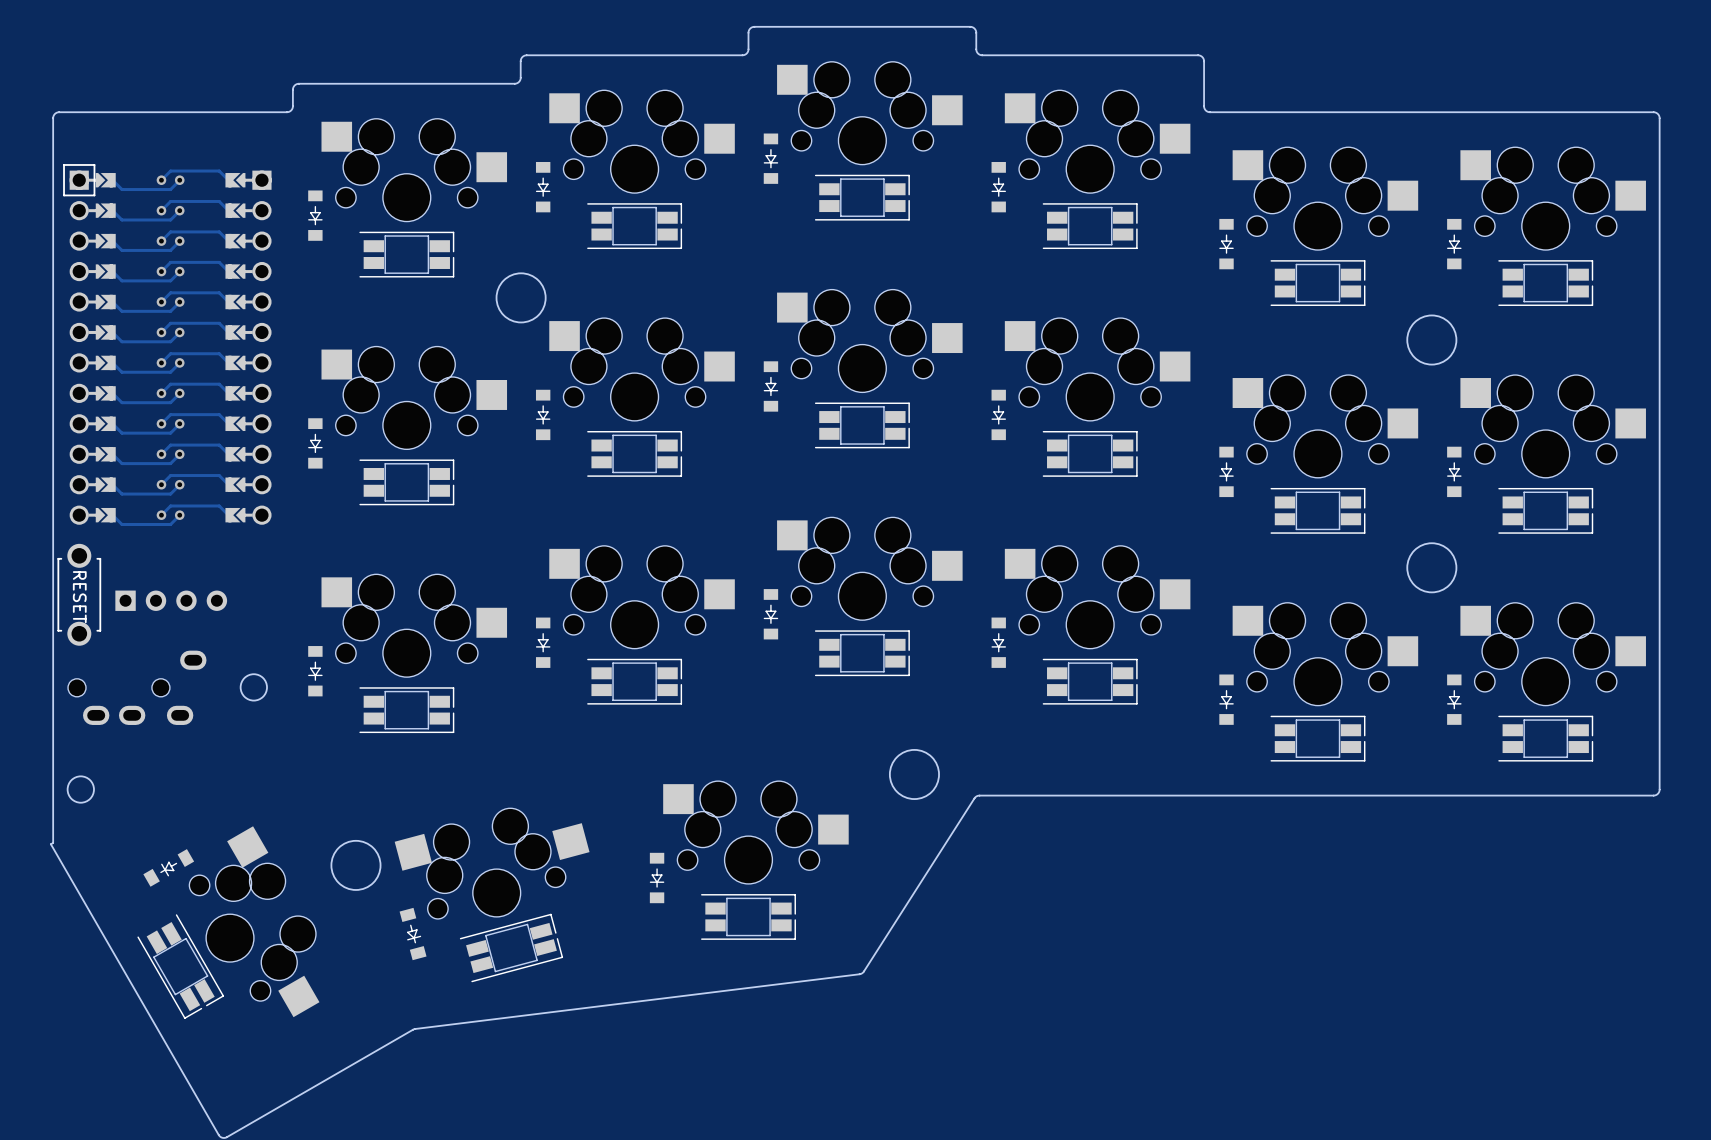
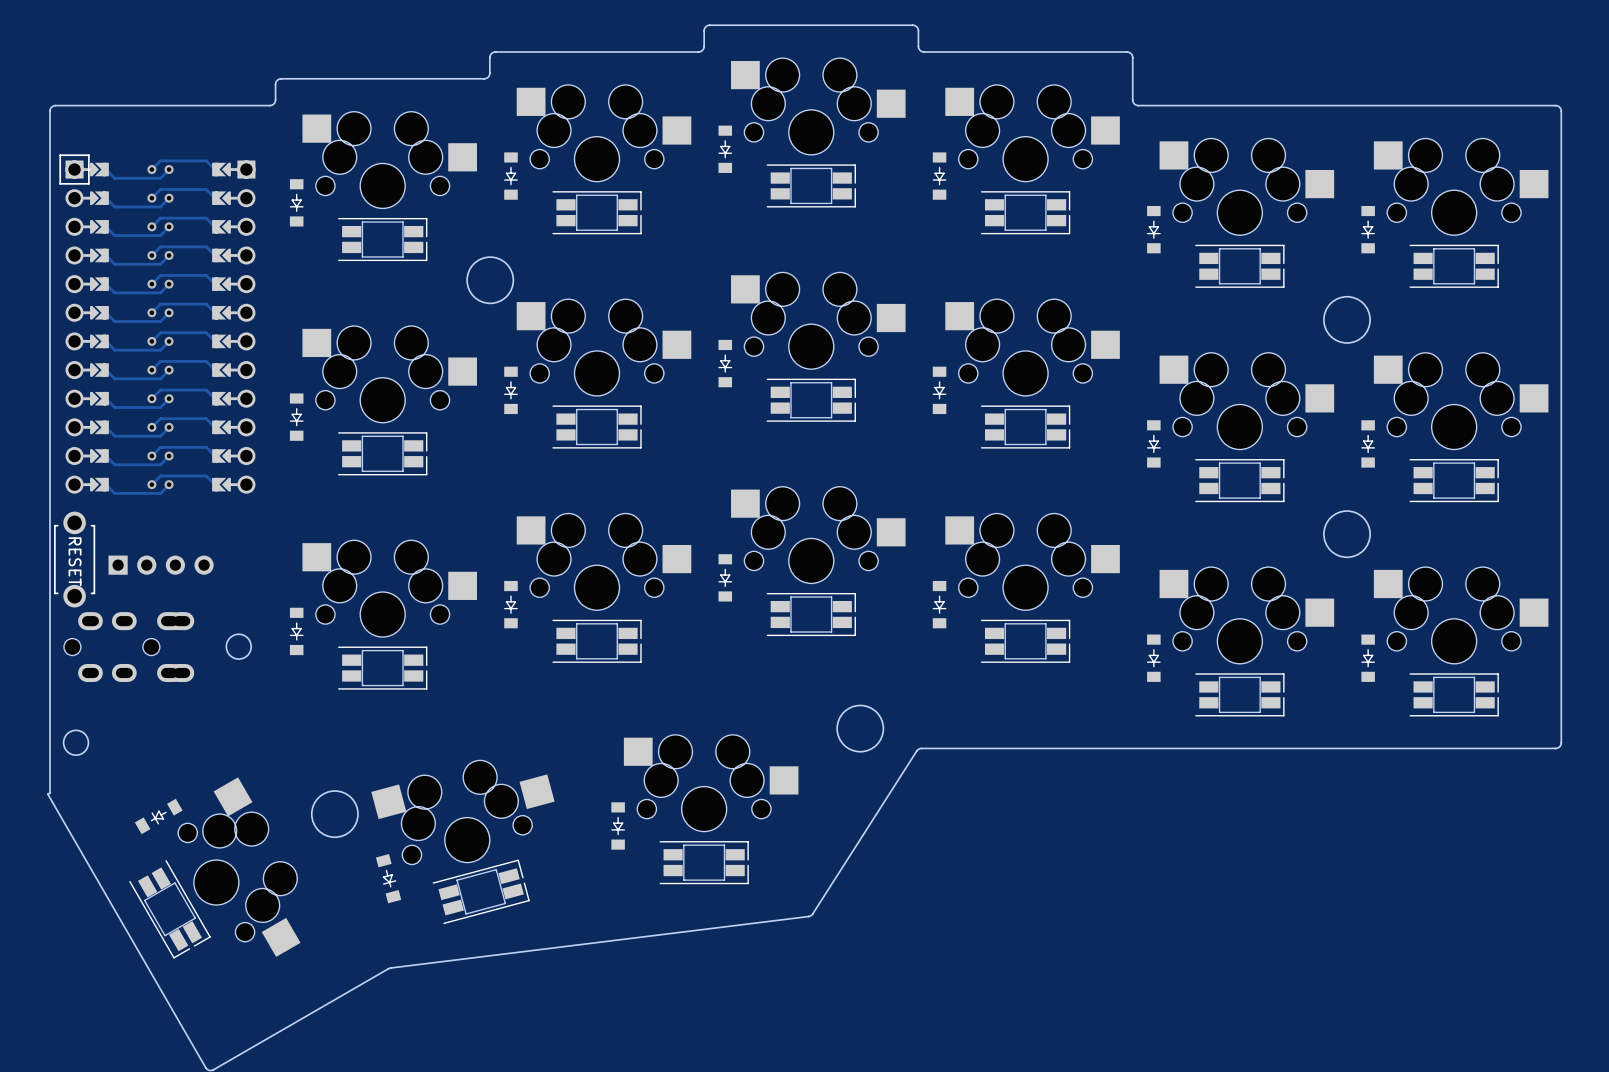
part footprint: [68, 650, 207, 725] -> [63, 612, 195, 683]

